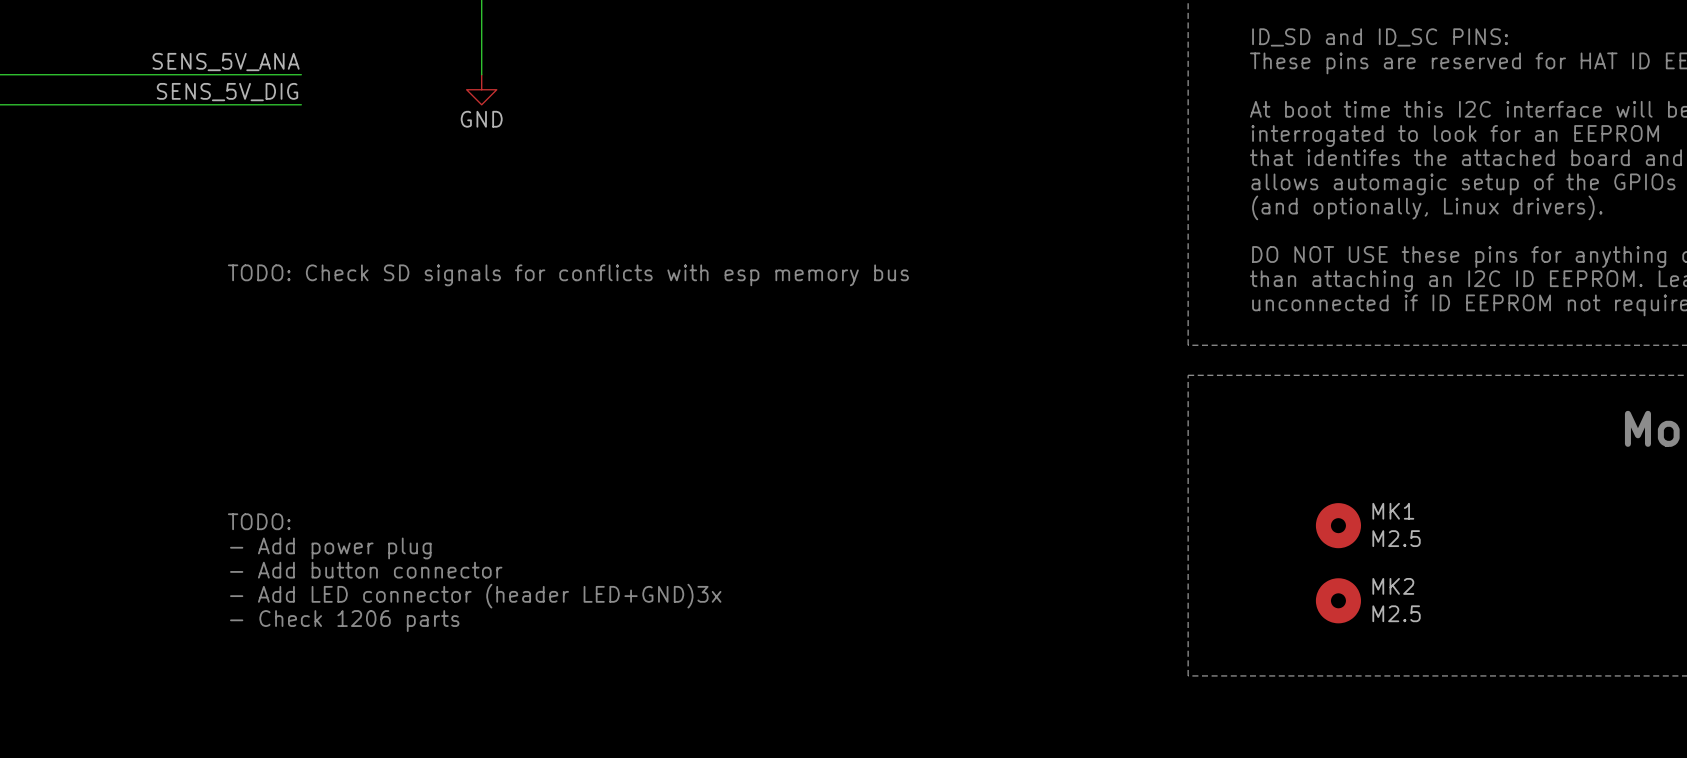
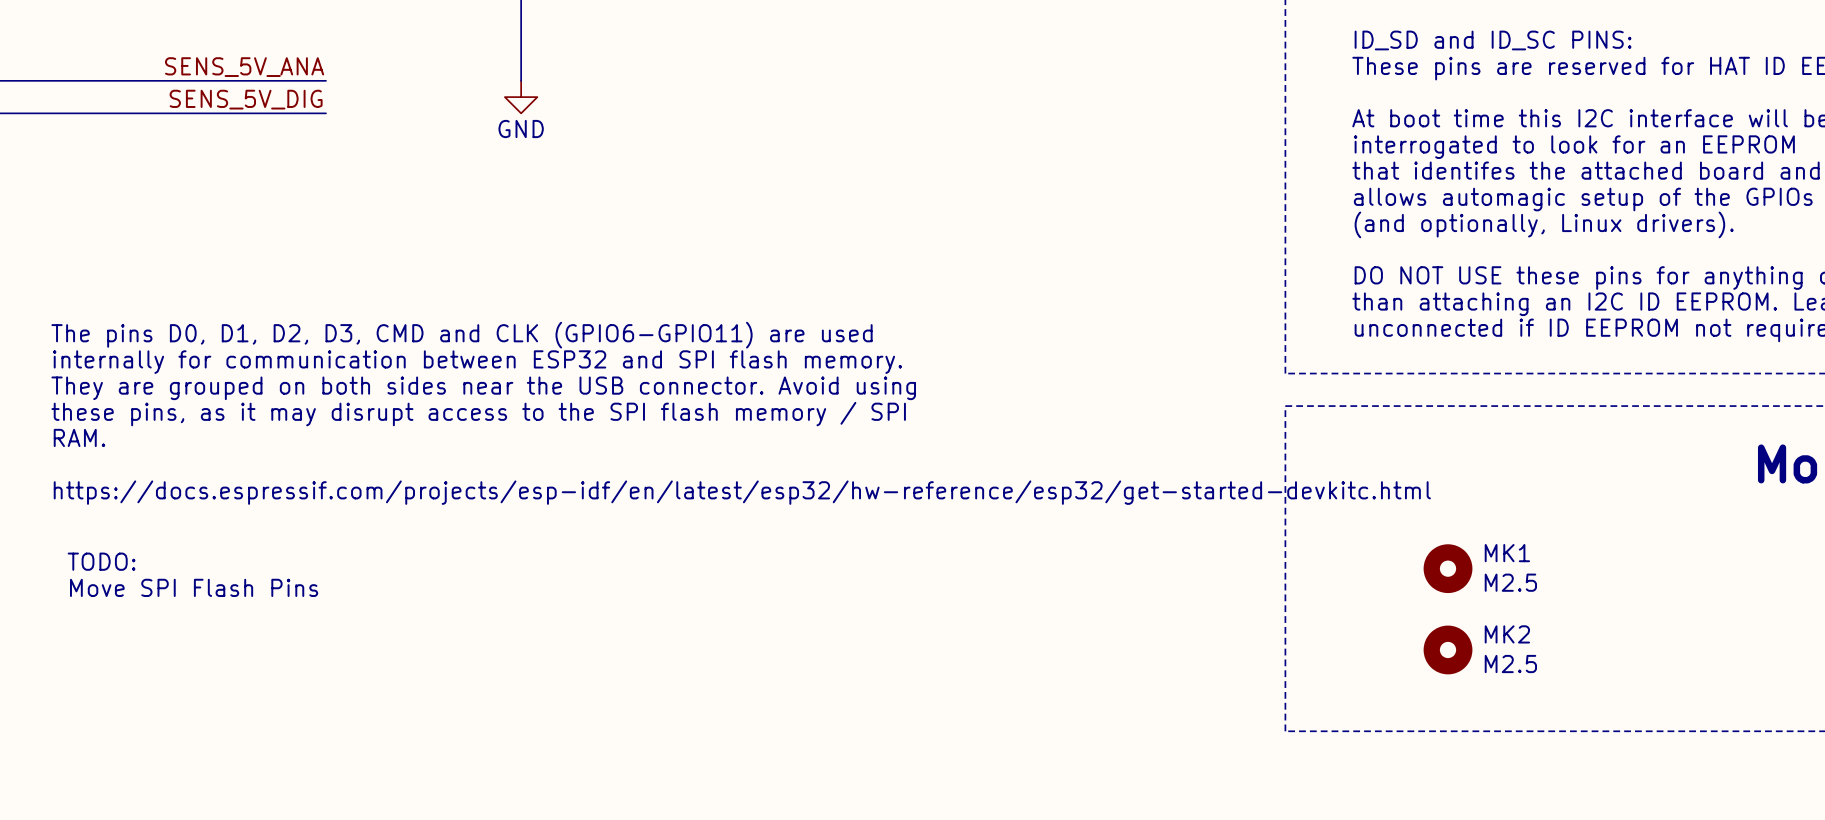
text: TODO: Check SD signals for conflicts with esp memory bus (568, 275) -> none
text: none -> The pins D0, D1, D2, D3, CMD and CLK (GPIO6-GPIO11) are used (462, 335)
text: none -> internally for communication between ESP32 and SPI flash memory. (477, 362)
text: none -> They are grouped on both sides near the USB connector. Avoid using (483, 388)
text: none -> these pins, as it may disrupt access to the SPI flash memory / SPI (478, 414)
text: none -> RAM. (79, 437)
text: none -> https://docs.espressif.com/projects/esp-idf/en/latest/esp32/hw-reference/esp32/get-started-devkitc.html (742, 492)
text position: TODO: (259, 521) -> TODO: (101, 561)
text: none -> Move SPI Flash Pins (194, 587)
text: - Add power plug (330, 548) -> none
text: - Add button connector (366, 570) -> none
text: - Add LED connector (header LED+GND)3x (475, 596) -> none
text: - Check 1206 parts (344, 621) -> none

